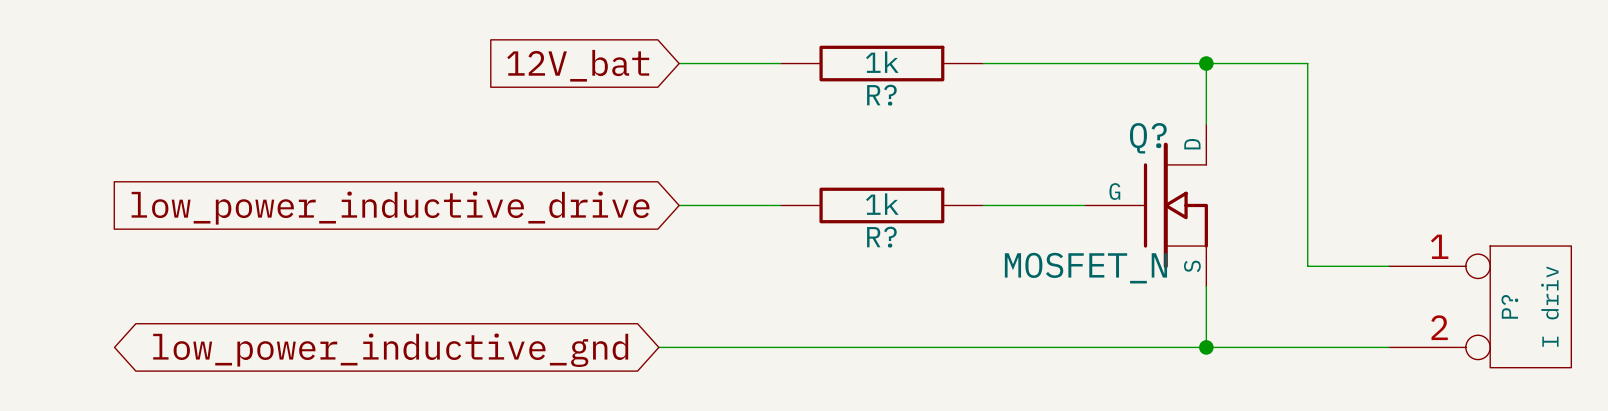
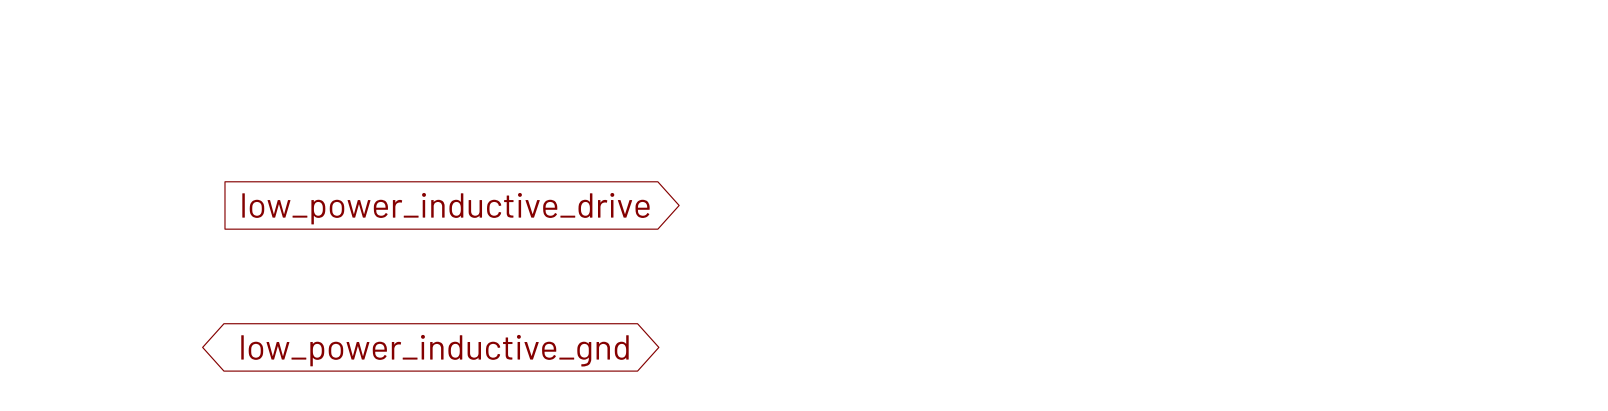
wire: (679, 63) (780, 63) -> none
R?: 1k (881, 63) -> none
wire: (983, 63) (1307, 63) (1307, 266) (1388, 266) -> none
wire: (1206, 63) (1206, 124) -> none
junction: (1206, 63) -> none
global label: 12V_bat (578, 65) -> none
wire: (679, 205) (780, 205) -> none
R?: 1k (881, 205) -> none
wire: (983, 205) (1084, 205) -> none
Q?: MOSFET_N (1146, 205) -> none
wire: (1206, 286) (1206, 347) -> none
P?: I driv (1480, 306) -> none
wire: (658, 347) (1388, 347) -> none
junction: (1206, 347) -> none

